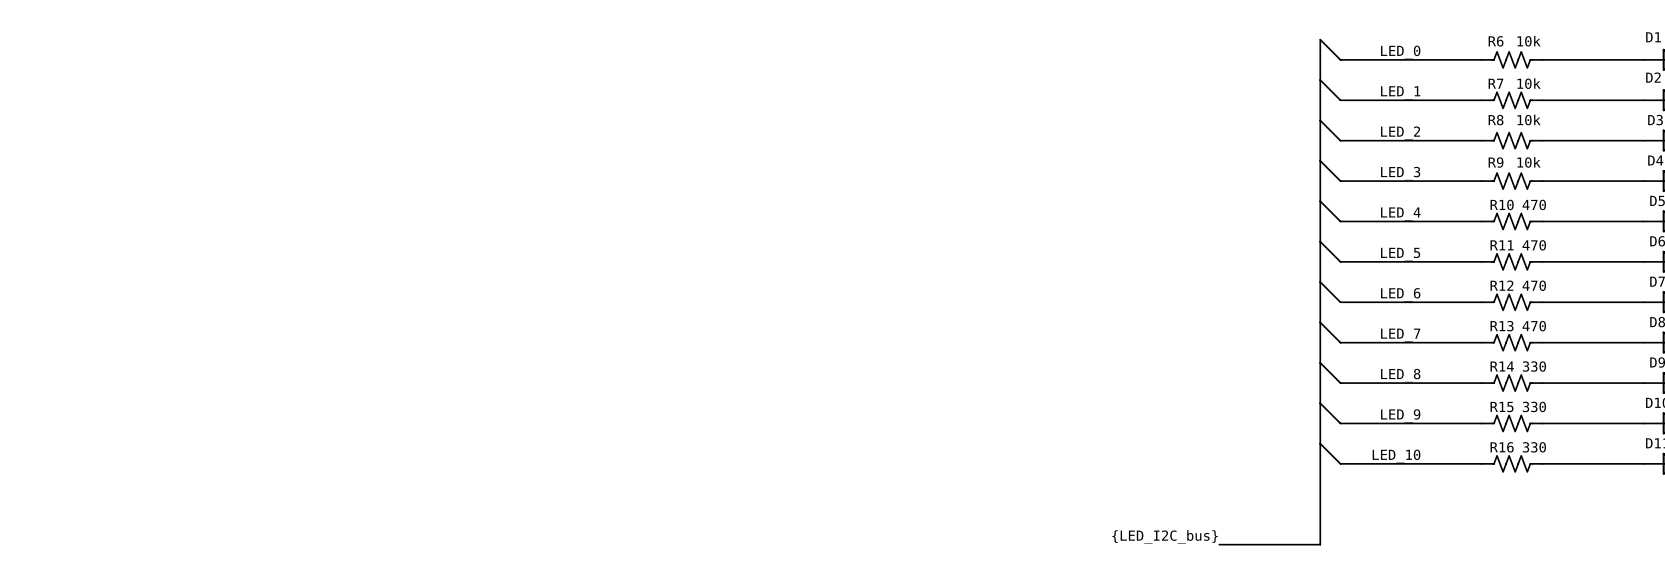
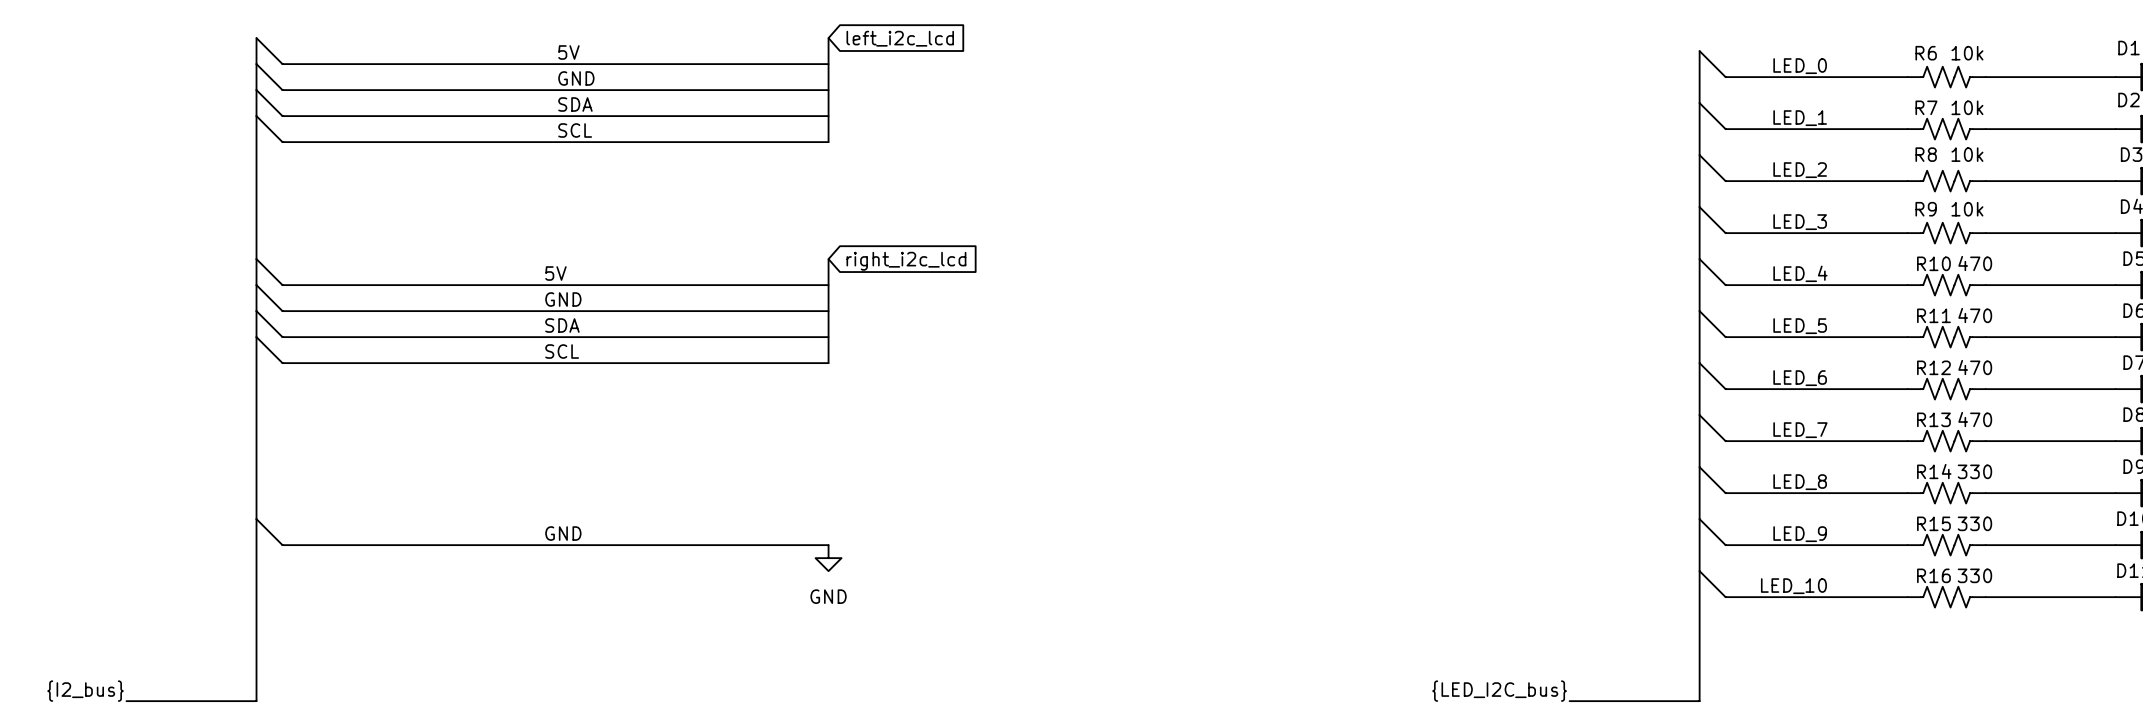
wire: none -> (256, 38) (282, 64) (828, 64)
bus: none -> (256, 38) (256, 701) (126, 701)
bus: none -> (828, 38) (828, 142)
global label: none -> left_i2c_lcd (900, 38)
label: none -> 5V (568, 52)
wire: none -> (256, 64) (282, 90) (828, 90)
label: none -> GND (576, 78)
wire: none -> (256, 90) (282, 116) (828, 116)
label: none -> SDA (575, 104)
wire: none -> (256, 116) (282, 142) (828, 142)
label: none -> SCL (575, 130)
wire: none -> (256, 259) (282, 285) (828, 285)
bus: none -> (828, 259) (828, 363)
global label: none -> right_i2c_lcd (906, 261)
label: none -> 5V (555, 273)
wire: none -> (256, 285) (282, 311) (828, 311)
label: none -> GND (563, 299)
wire: none -> (256, 311) (282, 337) (828, 337)
label: none -> SDA (562, 325)
wire: none -> (256, 337) (282, 363) (828, 363)
label: none -> SCL (562, 351)
wire: none -> (256, 519) (282, 545) (828, 545)
label: none -> GND (563, 533)
power symbol: none -> GND (828, 558)
label: none -> {I2_bus} (85, 691)

